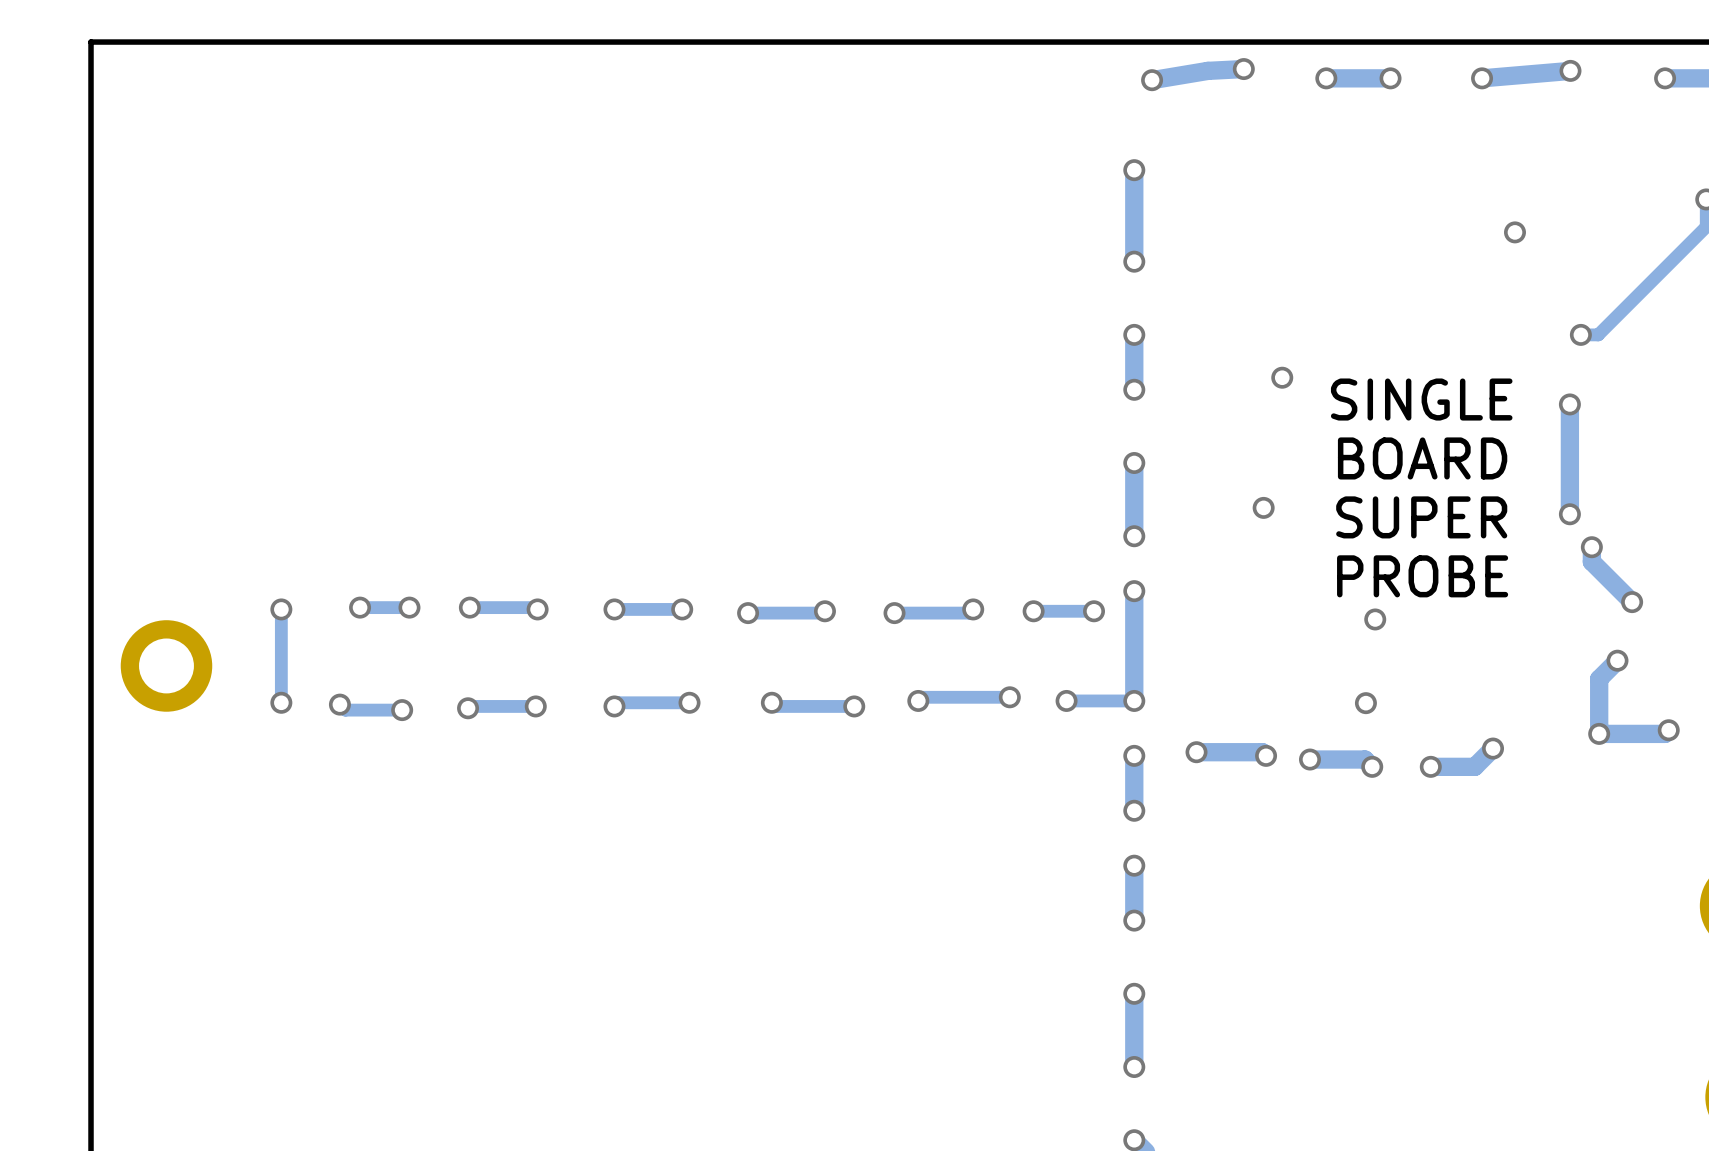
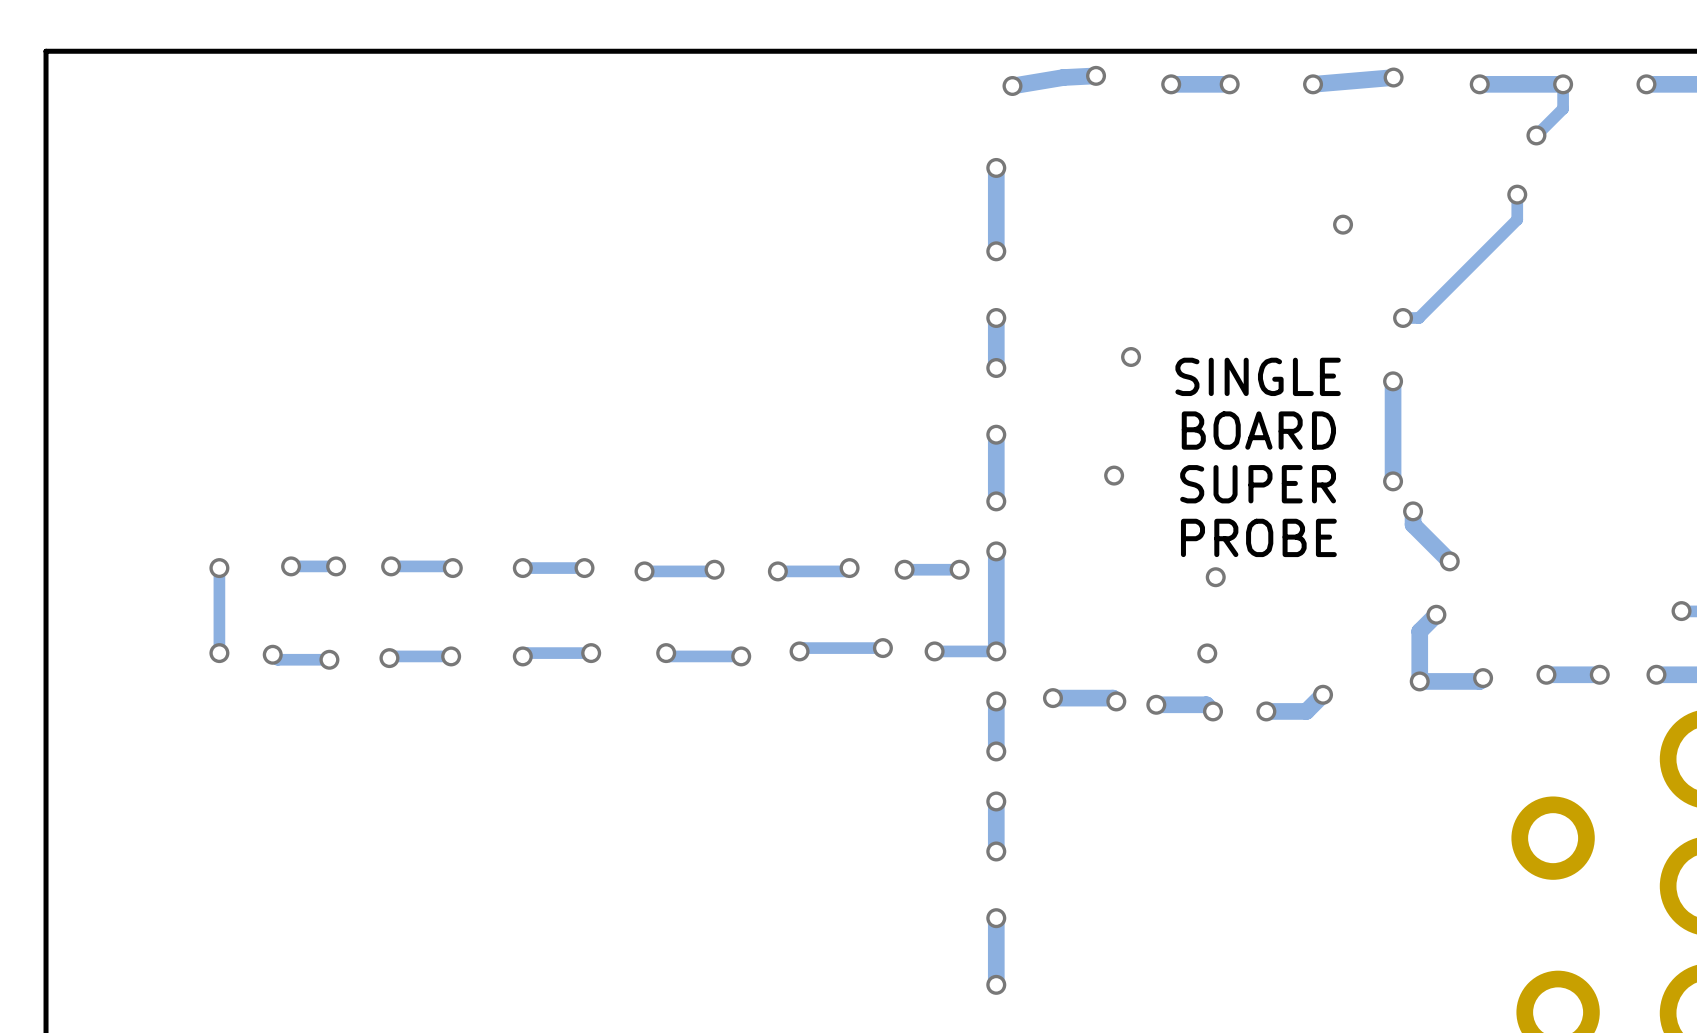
part: (166, 665) -> none

